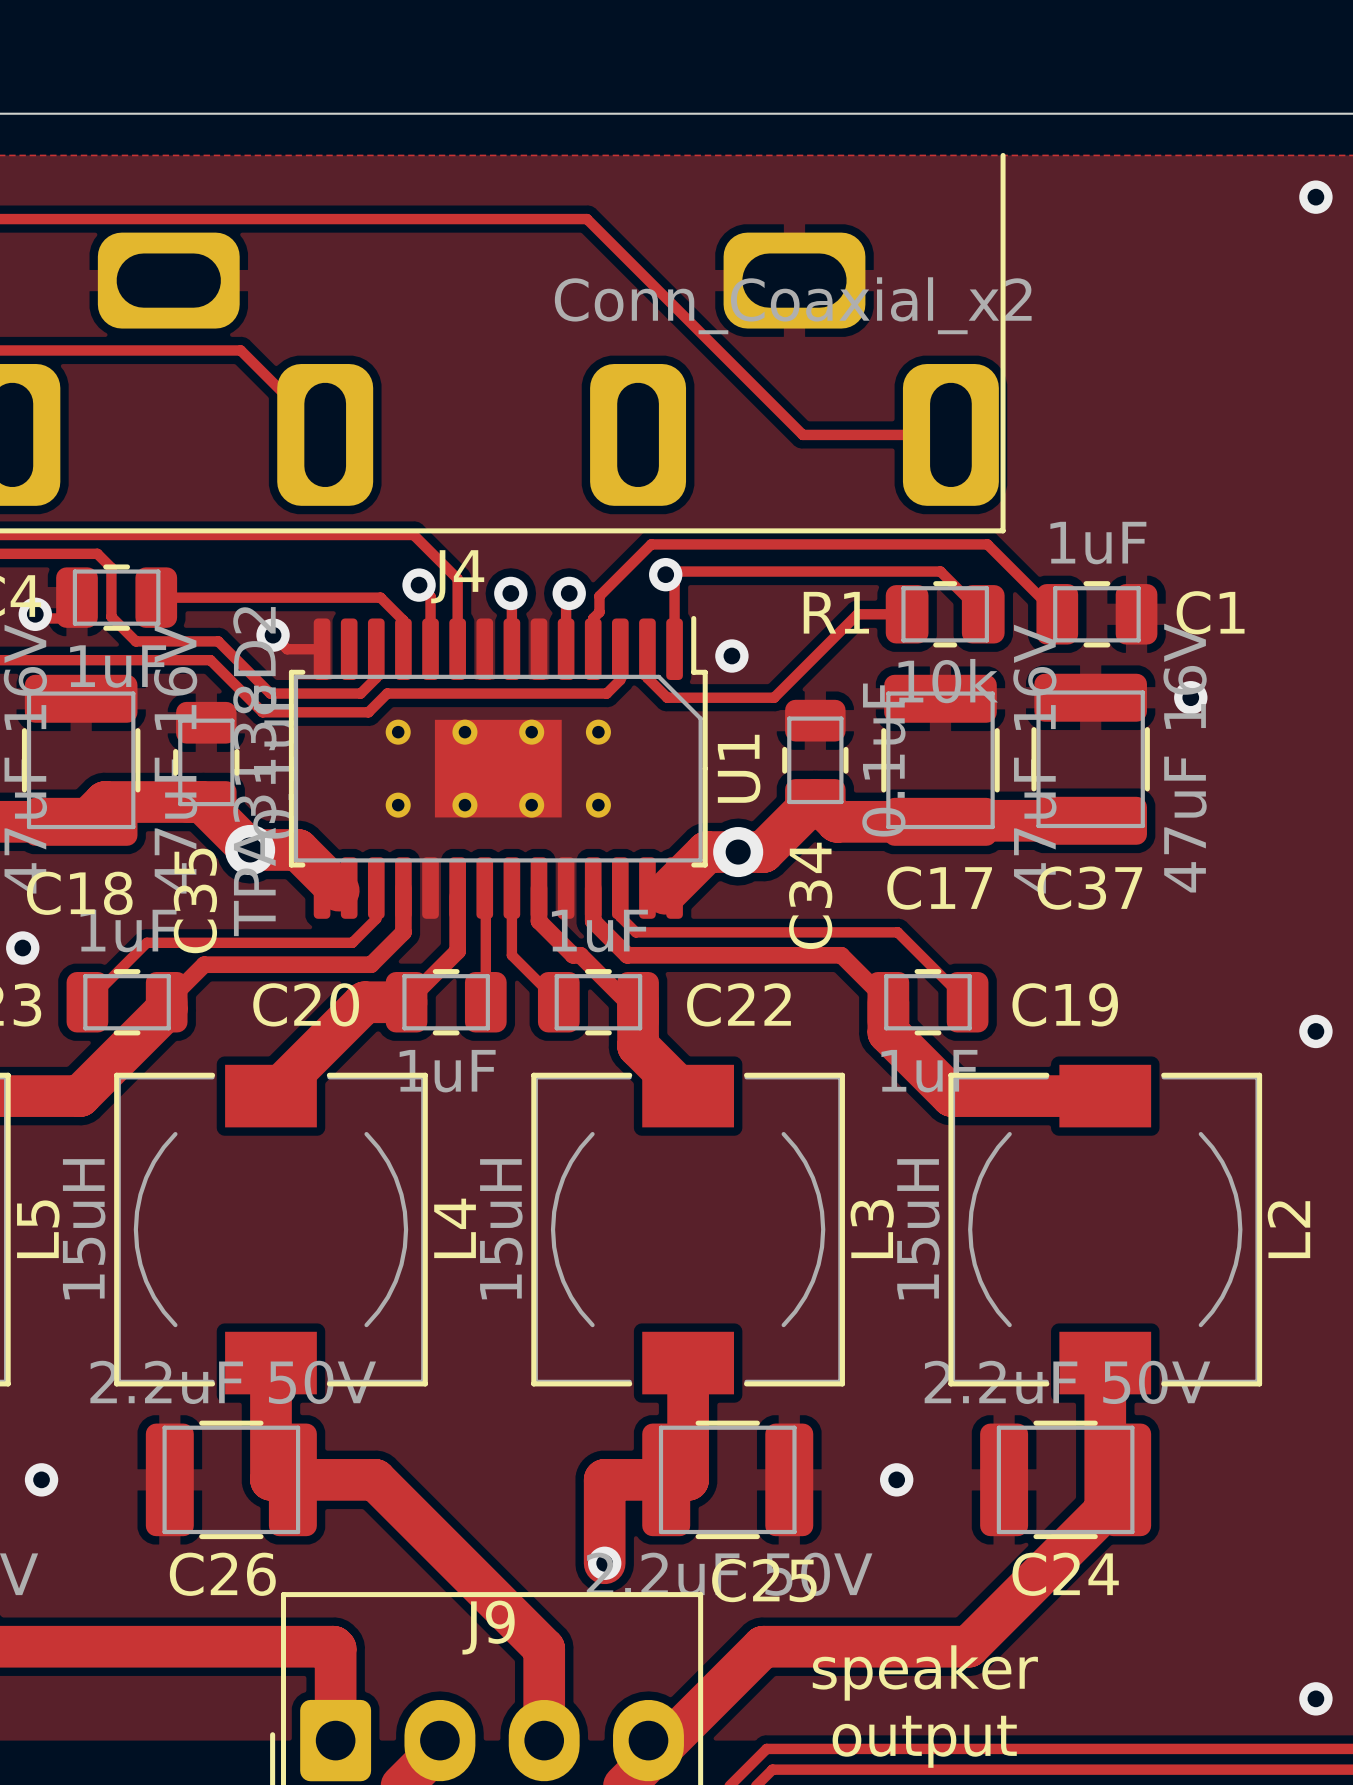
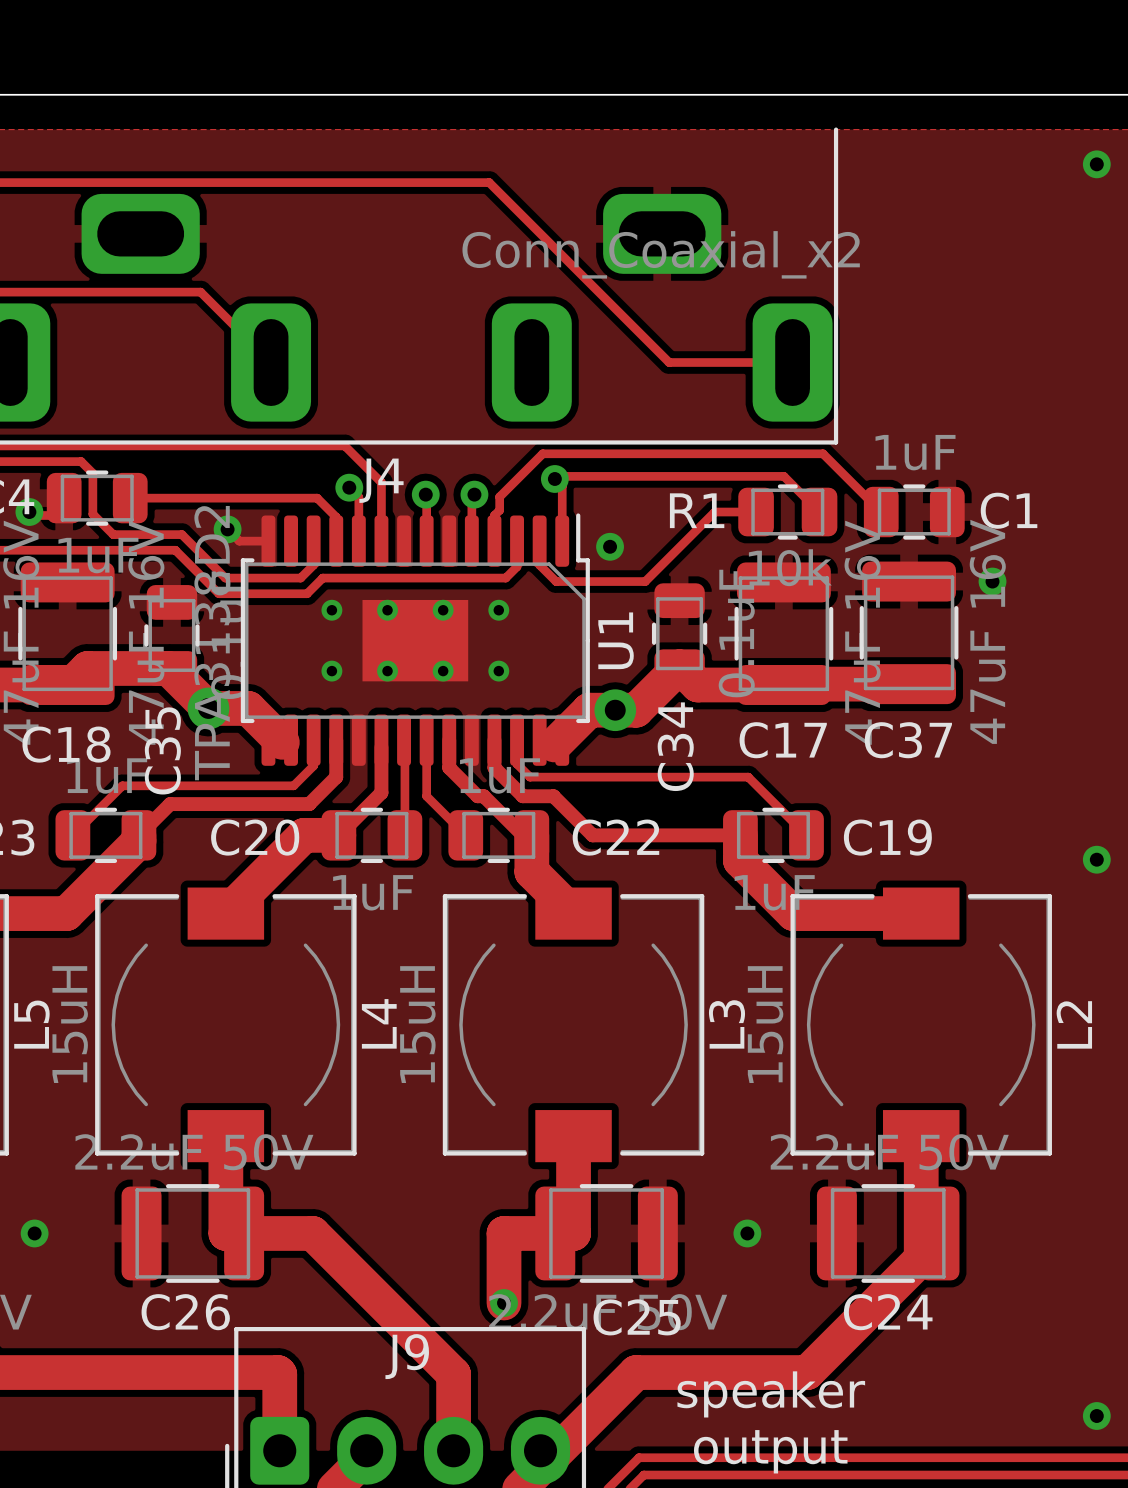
via: (22, 948) -> none
track: (664, 955) (841, 955) (888, 1002) -> (553, 796) (592, 835) (740, 835)

